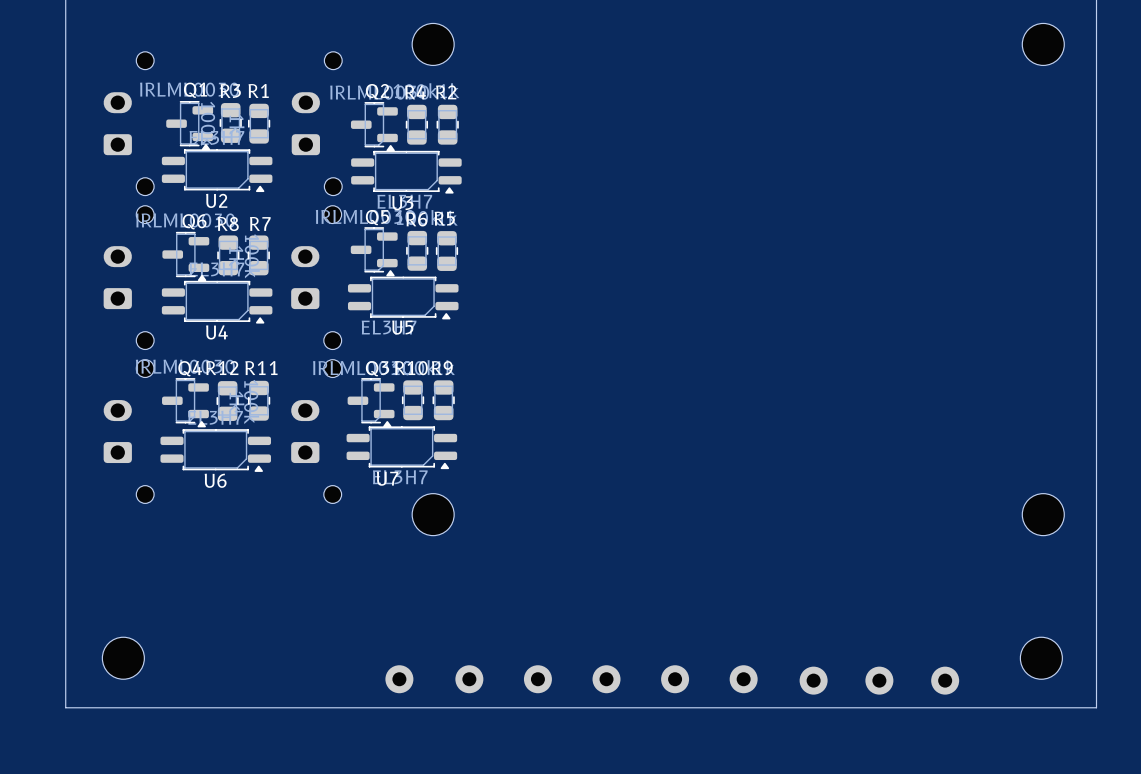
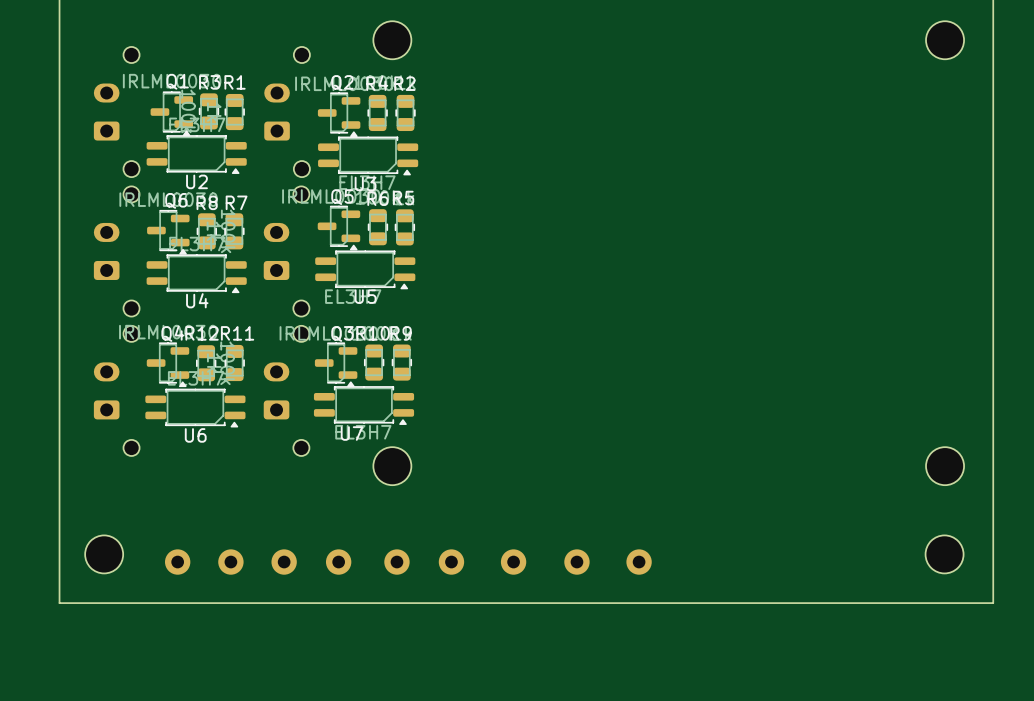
part: none -> (177, 562)
part: none -> (230, 562)
part: none -> (284, 562)
part: none -> (338, 562)
part: none -> (396, 562)
part: none -> (451, 562)
part: none -> (513, 562)
part: none -> (576, 562)
part: none -> (639, 562)
part position: (123, 658) -> (104, 554)
part position: (1041, 658) -> (944, 554)
board edge: (1096, 665) (1096, 707) (65, 707) (65, 665) -> (993, 603) (59, 603)
part: (399, 679) -> none
part: (469, 679) -> none
part: (537, 679) -> none
part: (606, 679) -> none
part: (675, 679) -> none
part: (743, 679) -> none
part: (813, 680) -> none
part: (879, 680) -> none
part: (945, 680) -> none

